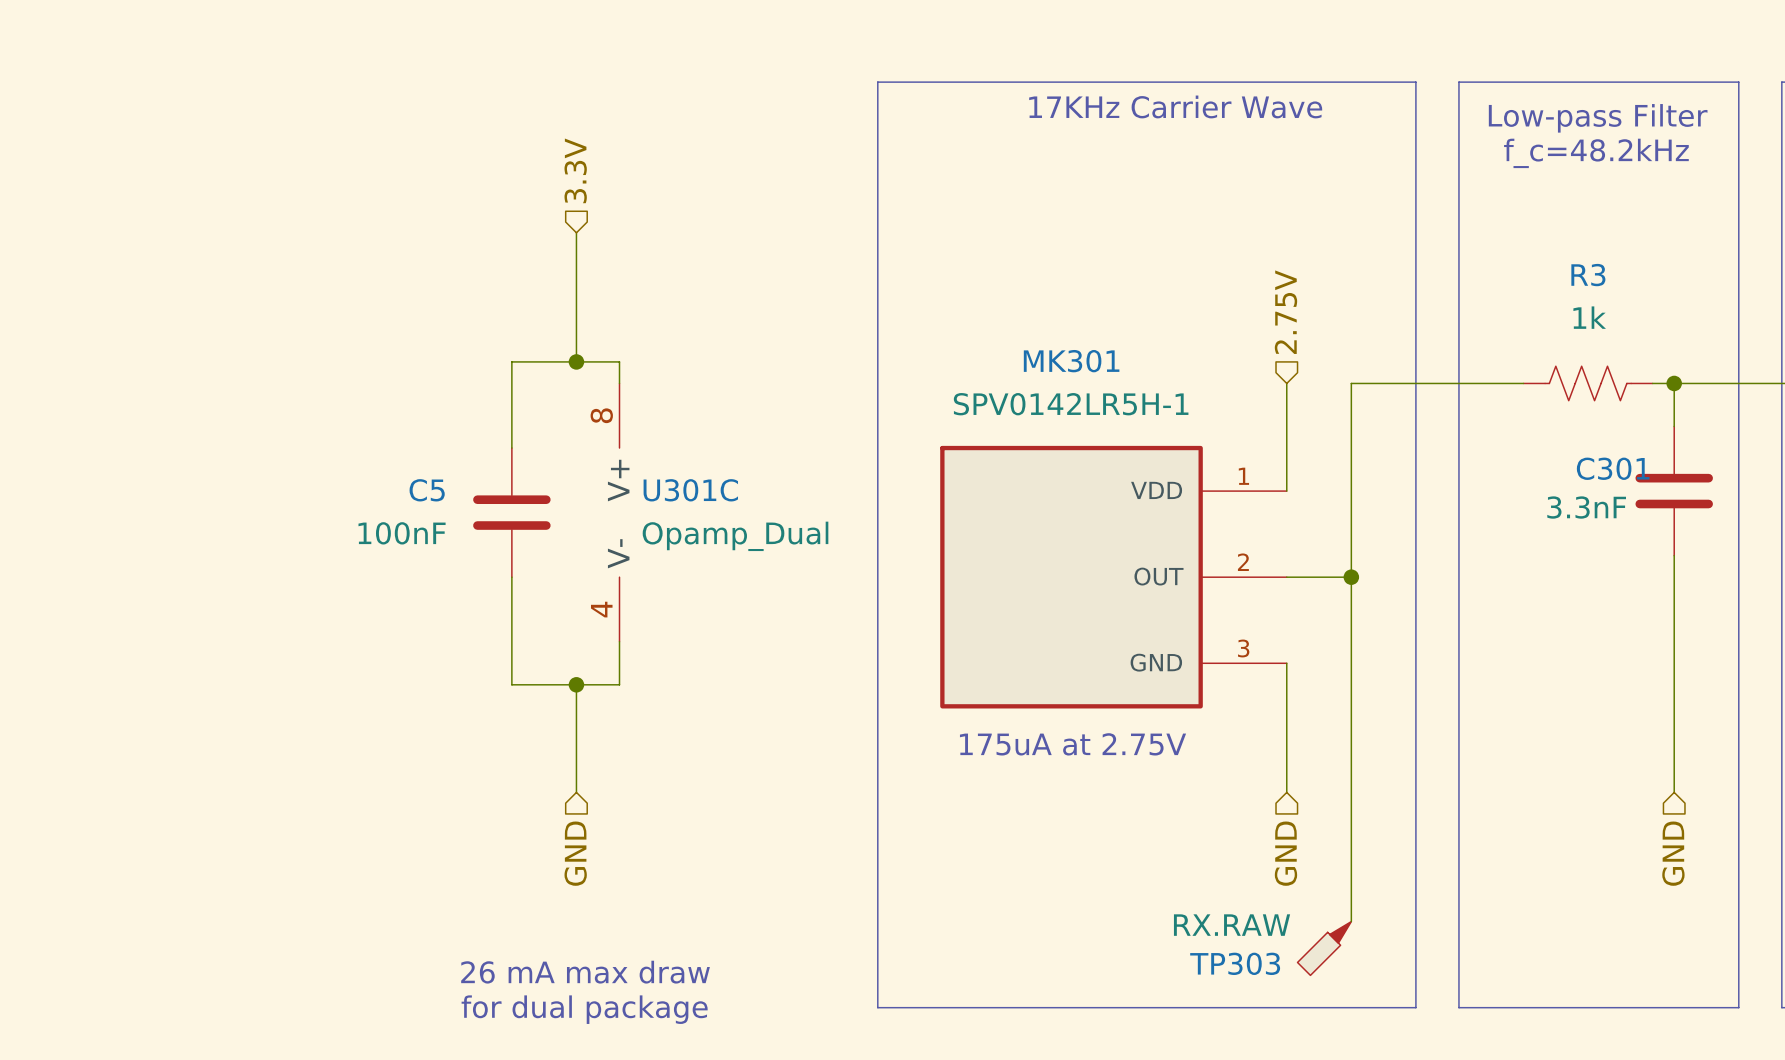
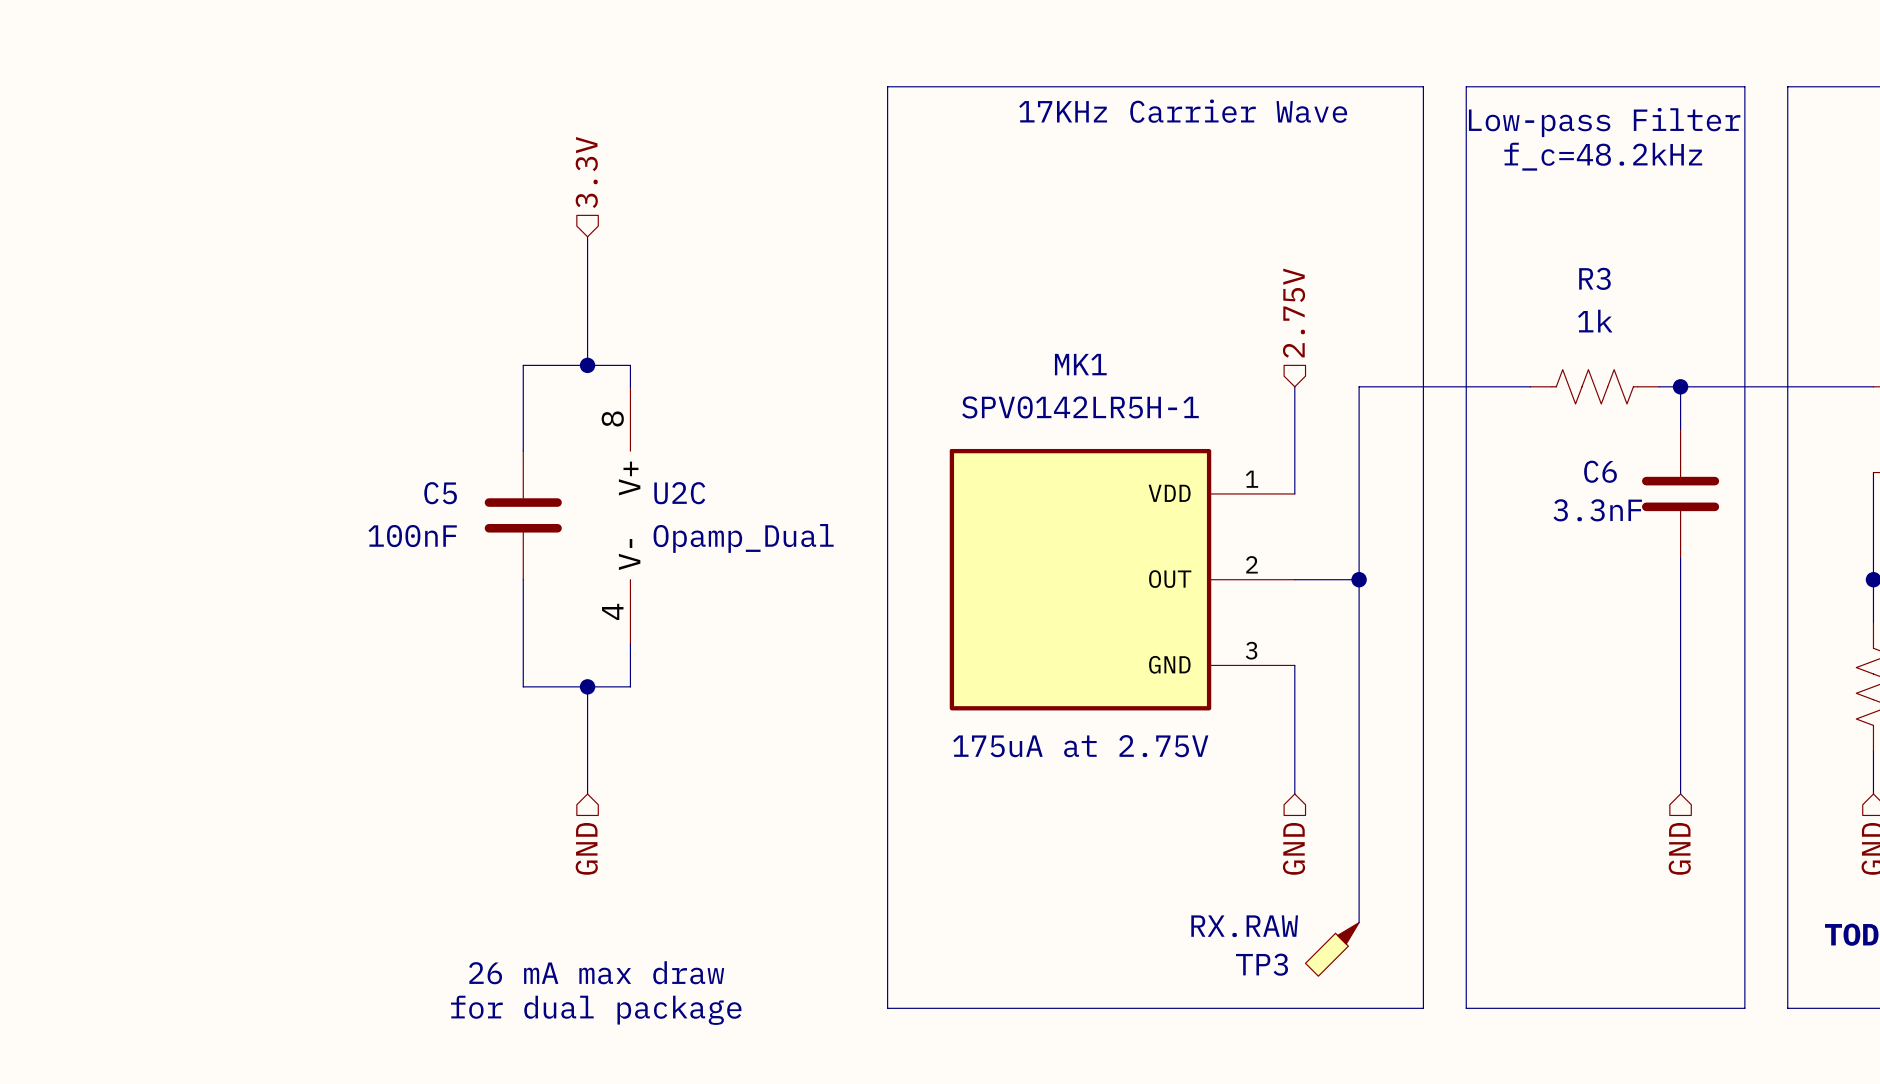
MK301 name: MK301 (1071, 361) -> MK1 (1080, 364)
C301 name: C301 (1613, 468) -> C6 (1600, 471)
U301C name: U301C (690, 490) -> U2C (679, 493)
TP303 name: TP303 (1235, 963) -> TP3 (1262, 964)

